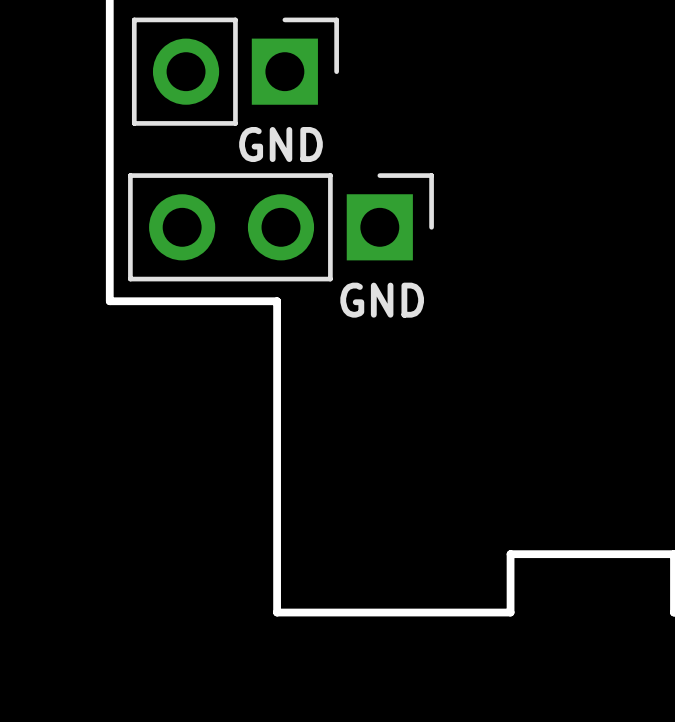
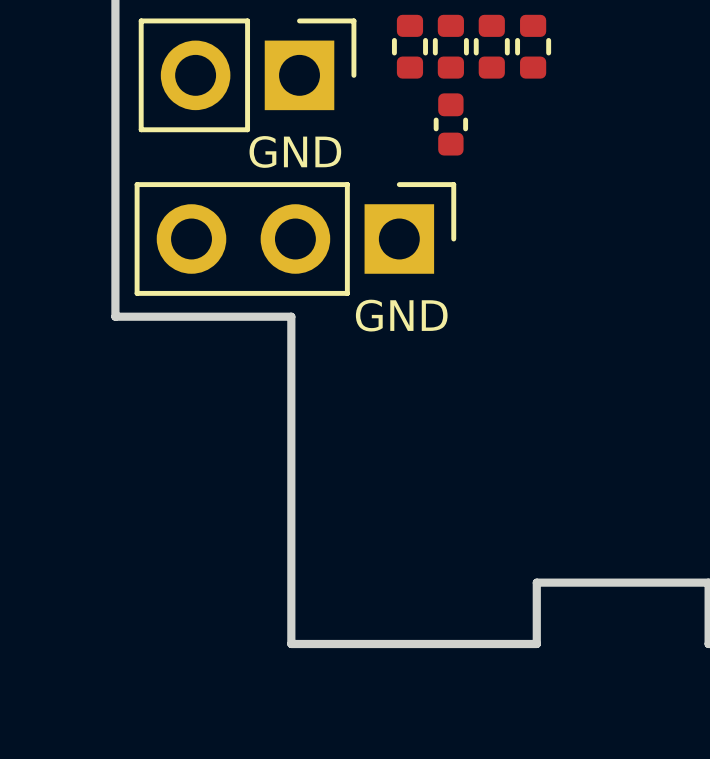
part: none -> (409, 46)
part: none -> (450, 46)
part: none -> (491, 46)
part: none -> (533, 46)
part: none -> (450, 124)

